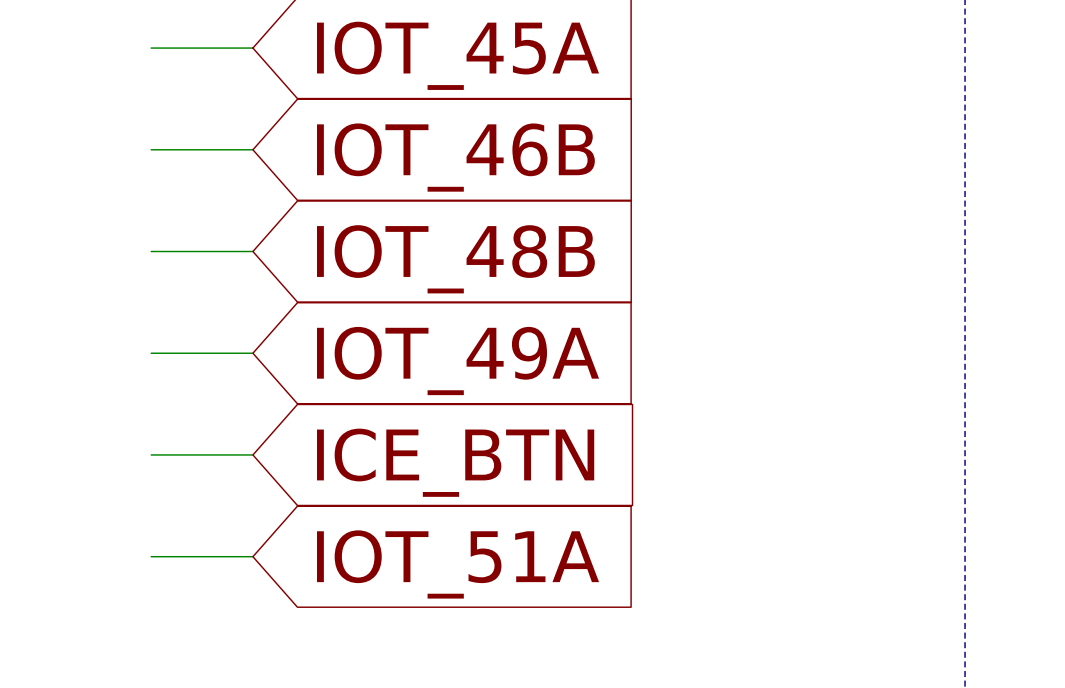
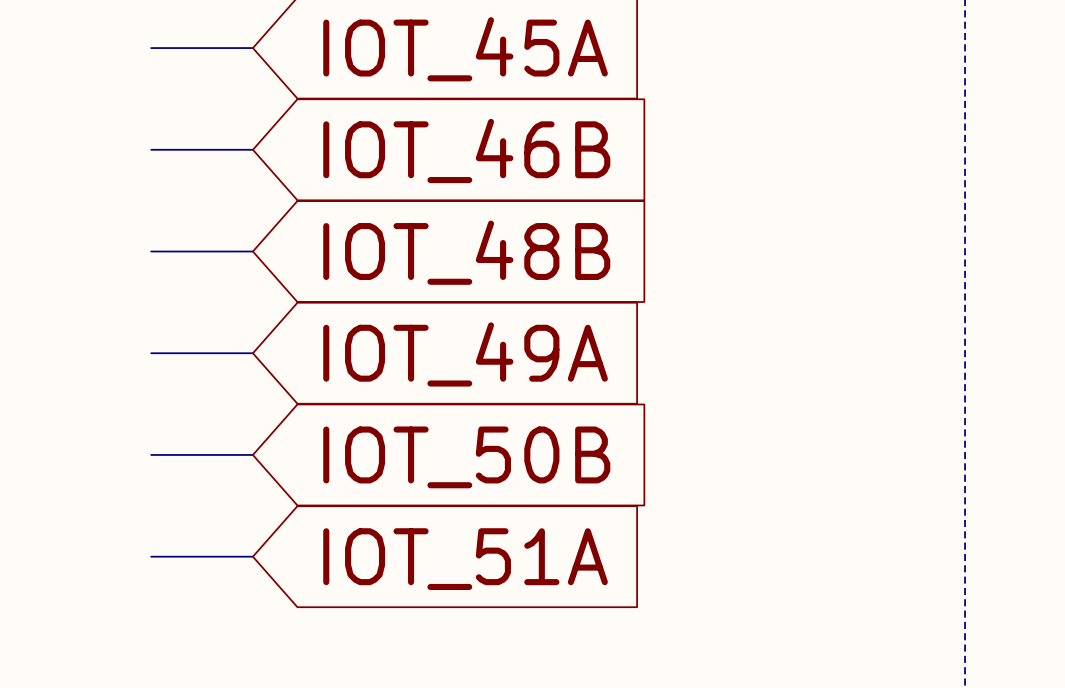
global label: ICE_BTN (455, 462) -> IOT_50B (466, 457)

